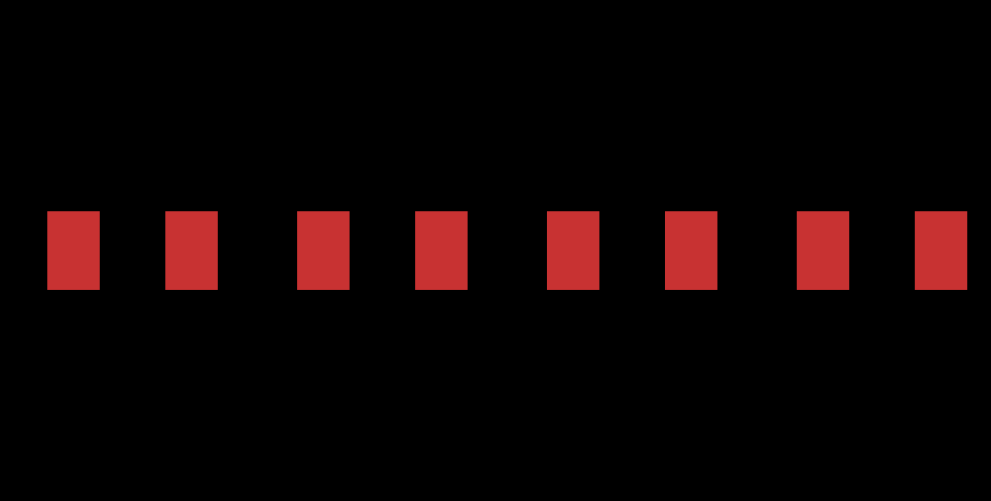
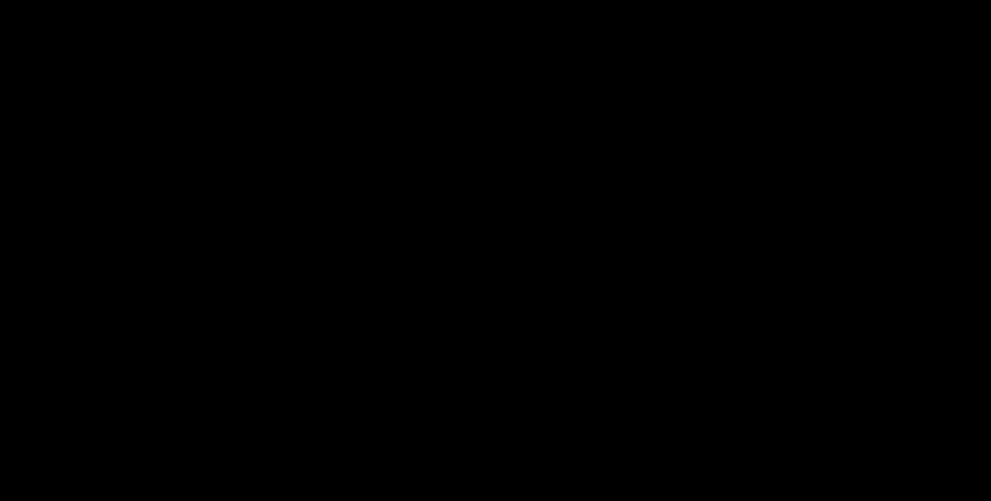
part: (132, 250) -> none
part: (382, 250) -> none
part: (632, 250) -> none
part: (882, 250) -> none

